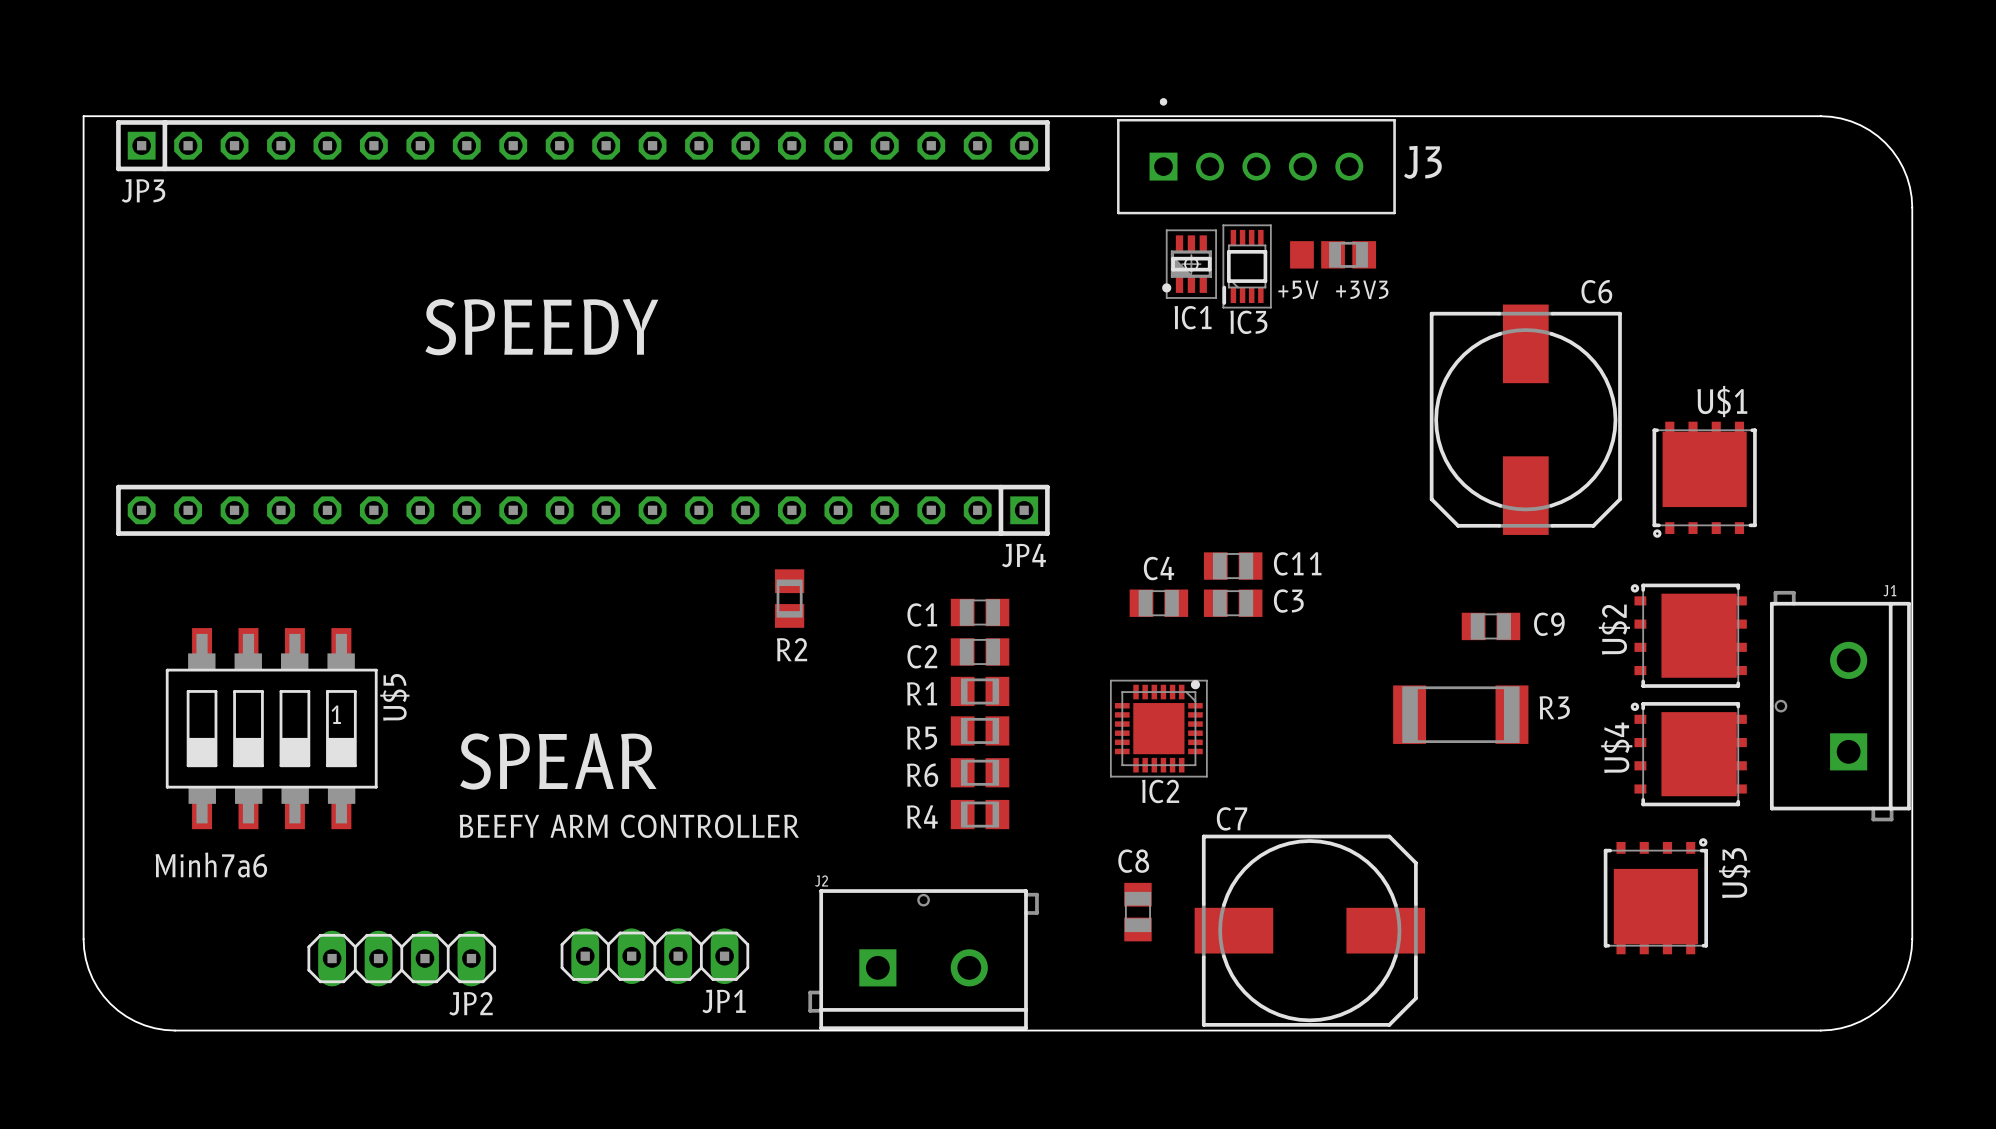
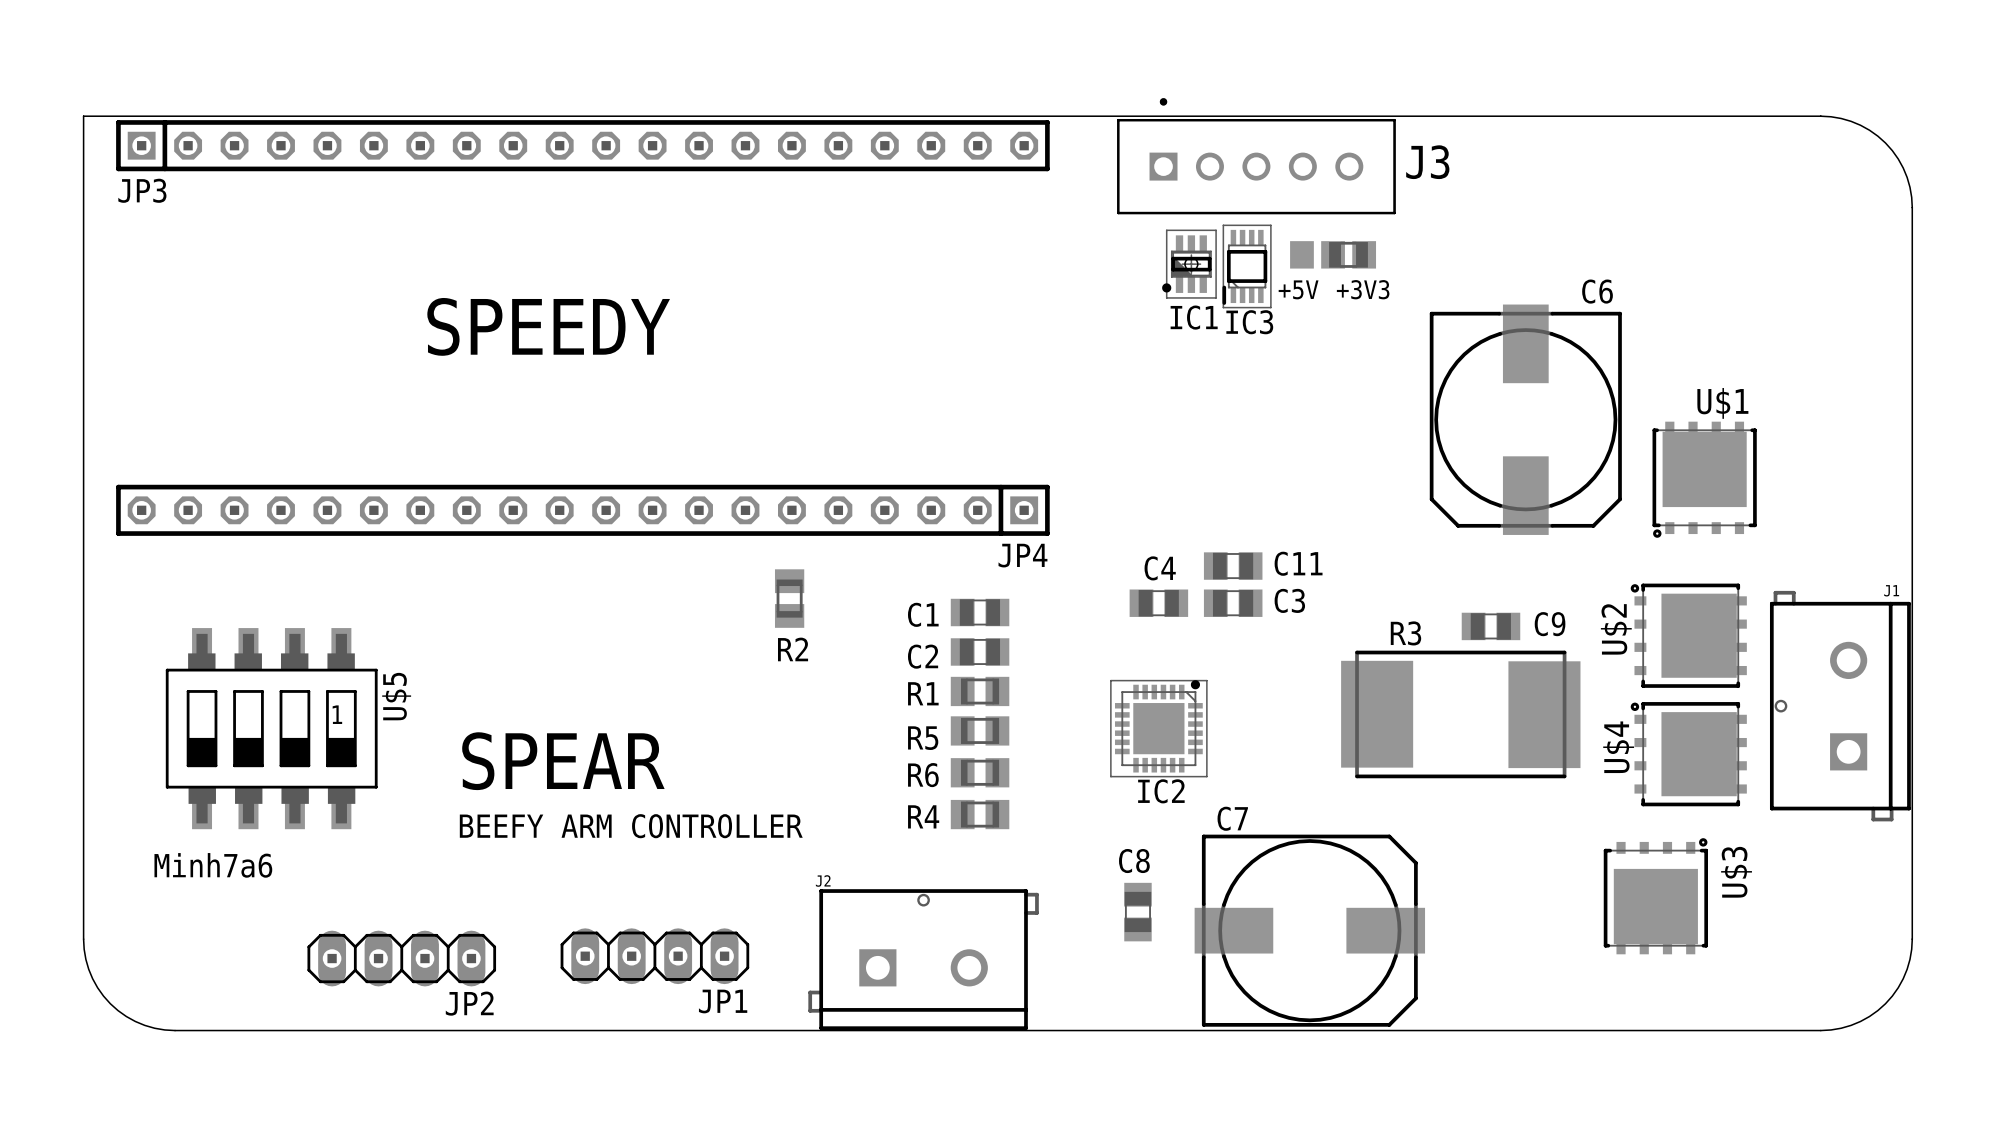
R3 footprint: [1393, 685, 1529, 744] -> [1341, 650, 1581, 779]
R3 name position: R3 (1554, 707) -> R3 (1405, 633)

